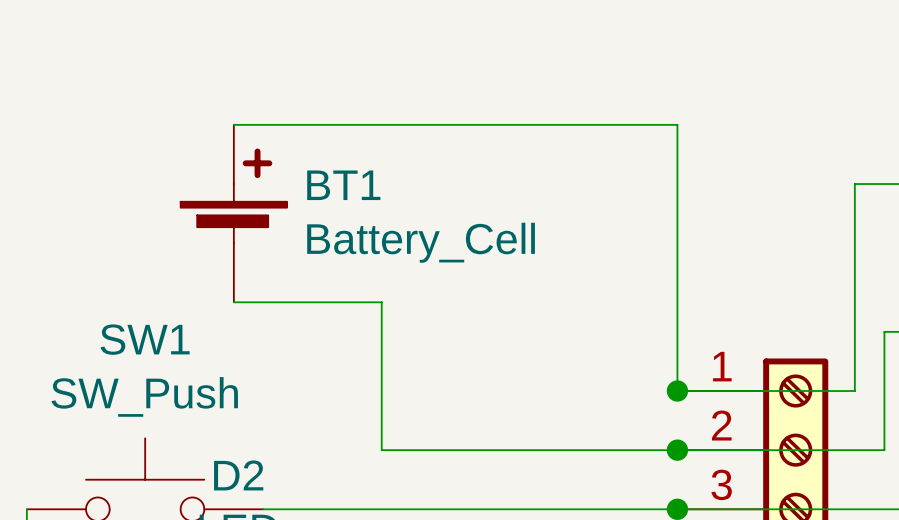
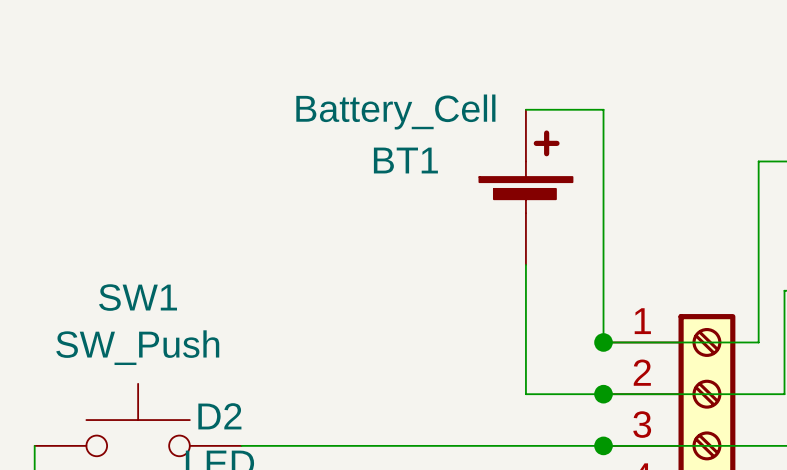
wire: (233, 124) (588, 124) -> none
BT1 name position: BT1 (343, 185) -> BT1 (405, 160)
BT1 position: (233, 213) -> (525, 187)
BT1 value position: Battery_Cell (421, 242) -> Battery_Cell (395, 112)
wire: (233, 302) (381, 302) (381, 450) (588, 450) -> (525, 264) (525, 394)

